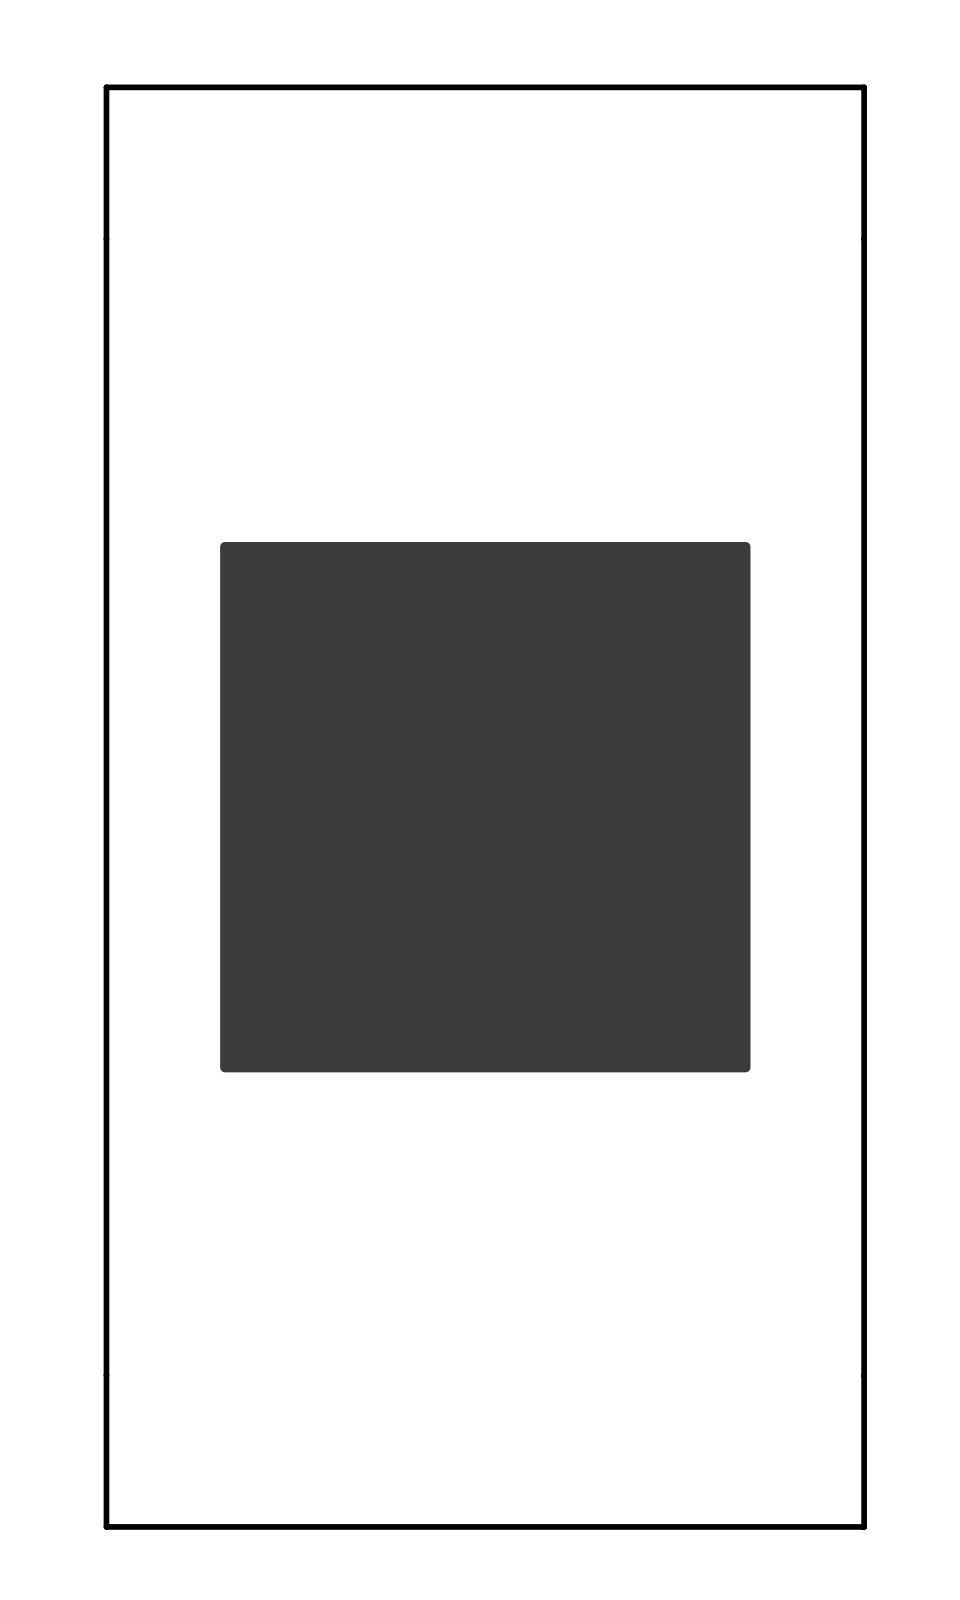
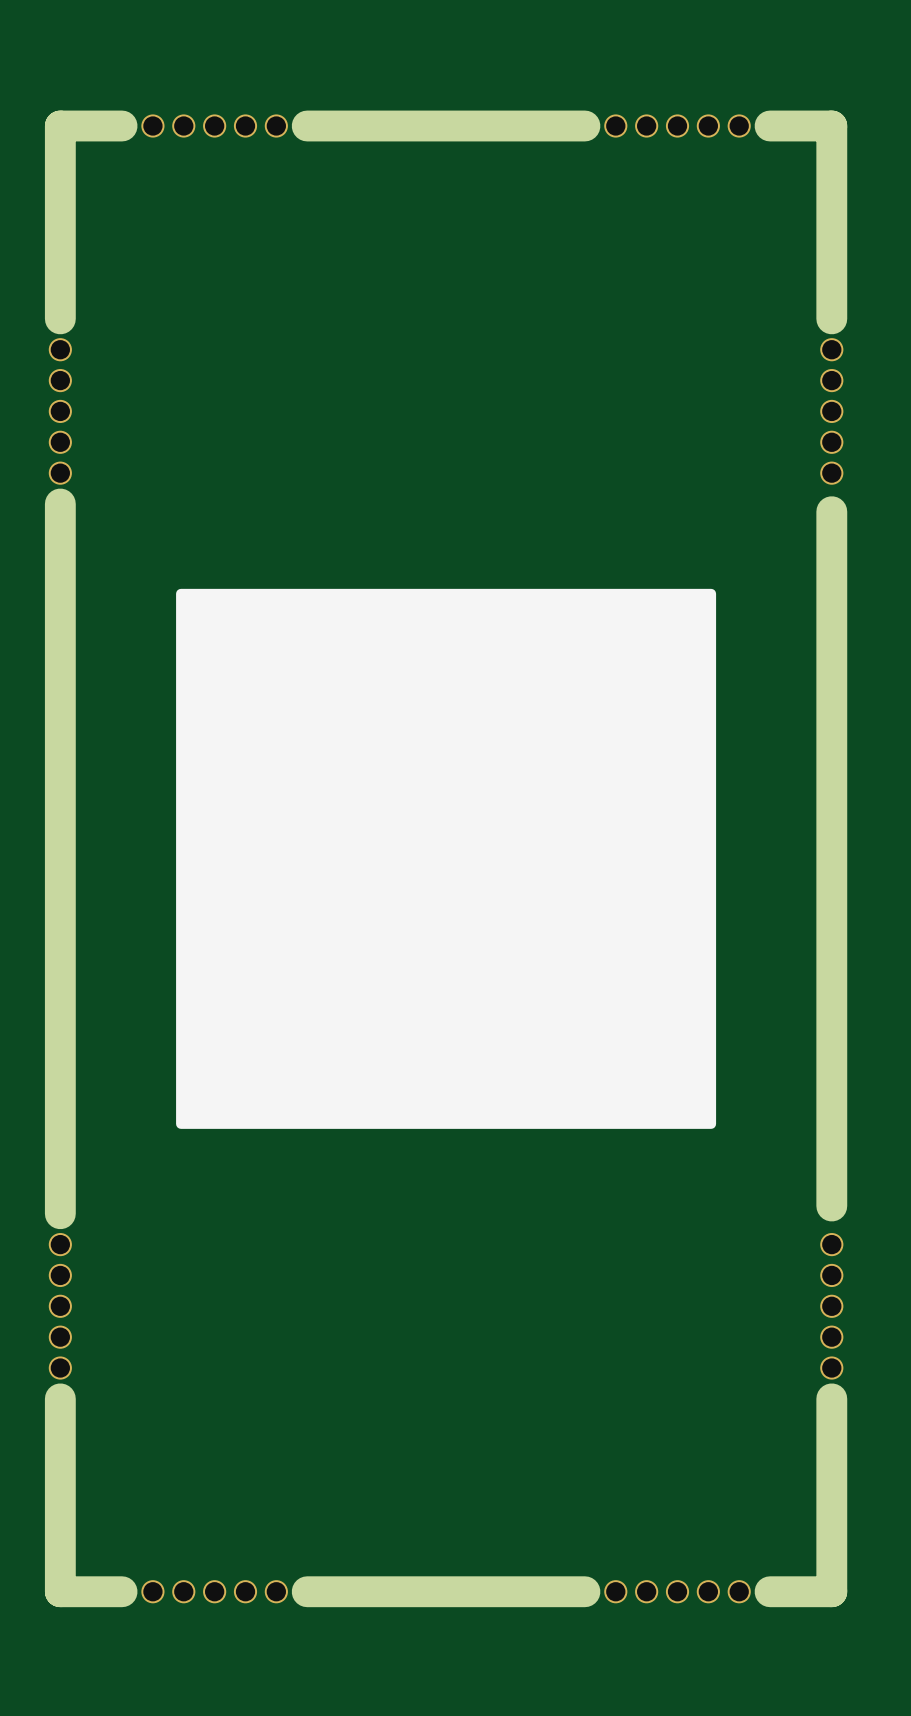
board edge width: thin (167, 87) (106, 87) (106, 276) -> thick (122, 126) (60, 126) (60, 318)
part: none -> (214, 126)
board edge: (348, 87) (167, 87) -> none
board edge width: thin (621, 87) (348, 87) -> thick (584, 126) (307, 126)
part: none -> (677, 126)
board edge: (803, 87) (621, 87) -> none
board edge width: thin (803, 87) (864, 87) (864, 276) -> thick (770, 126) (831, 126) (831, 318)
board edge: (106, 276) (106, 458) -> none
board edge: (864, 276) (864, 466) -> none
part: none -> (60, 411)
part: none -> (831, 411)
board edge width: thin (106, 458) (106, 1155) -> thick (60, 504) (60, 1213)
board edge width: thin (864, 466) (864, 1148) -> thick (831, 511) (831, 1206)
board edge: (864, 1148) (864, 1337) -> none
board edge: (106, 1155) (106, 1337) -> none
part: none -> (60, 1306)
part: none -> (831, 1306)
board edge width: thin (106, 1337) (106, 1526) (167, 1526) -> thick (60, 1398) (60, 1591) (122, 1591)
board edge width: thin (864, 1337) (864, 1526) (803, 1526) -> thick (831, 1398) (831, 1591) (770, 1591)
part: none -> (214, 1591)
board edge: (348, 1526) (167, 1526) -> none
board edge width: thin (621, 1526) (348, 1526) -> thick (584, 1591) (307, 1591)
part: none -> (677, 1591)
board edge: (803, 1526) (621, 1526) -> none

